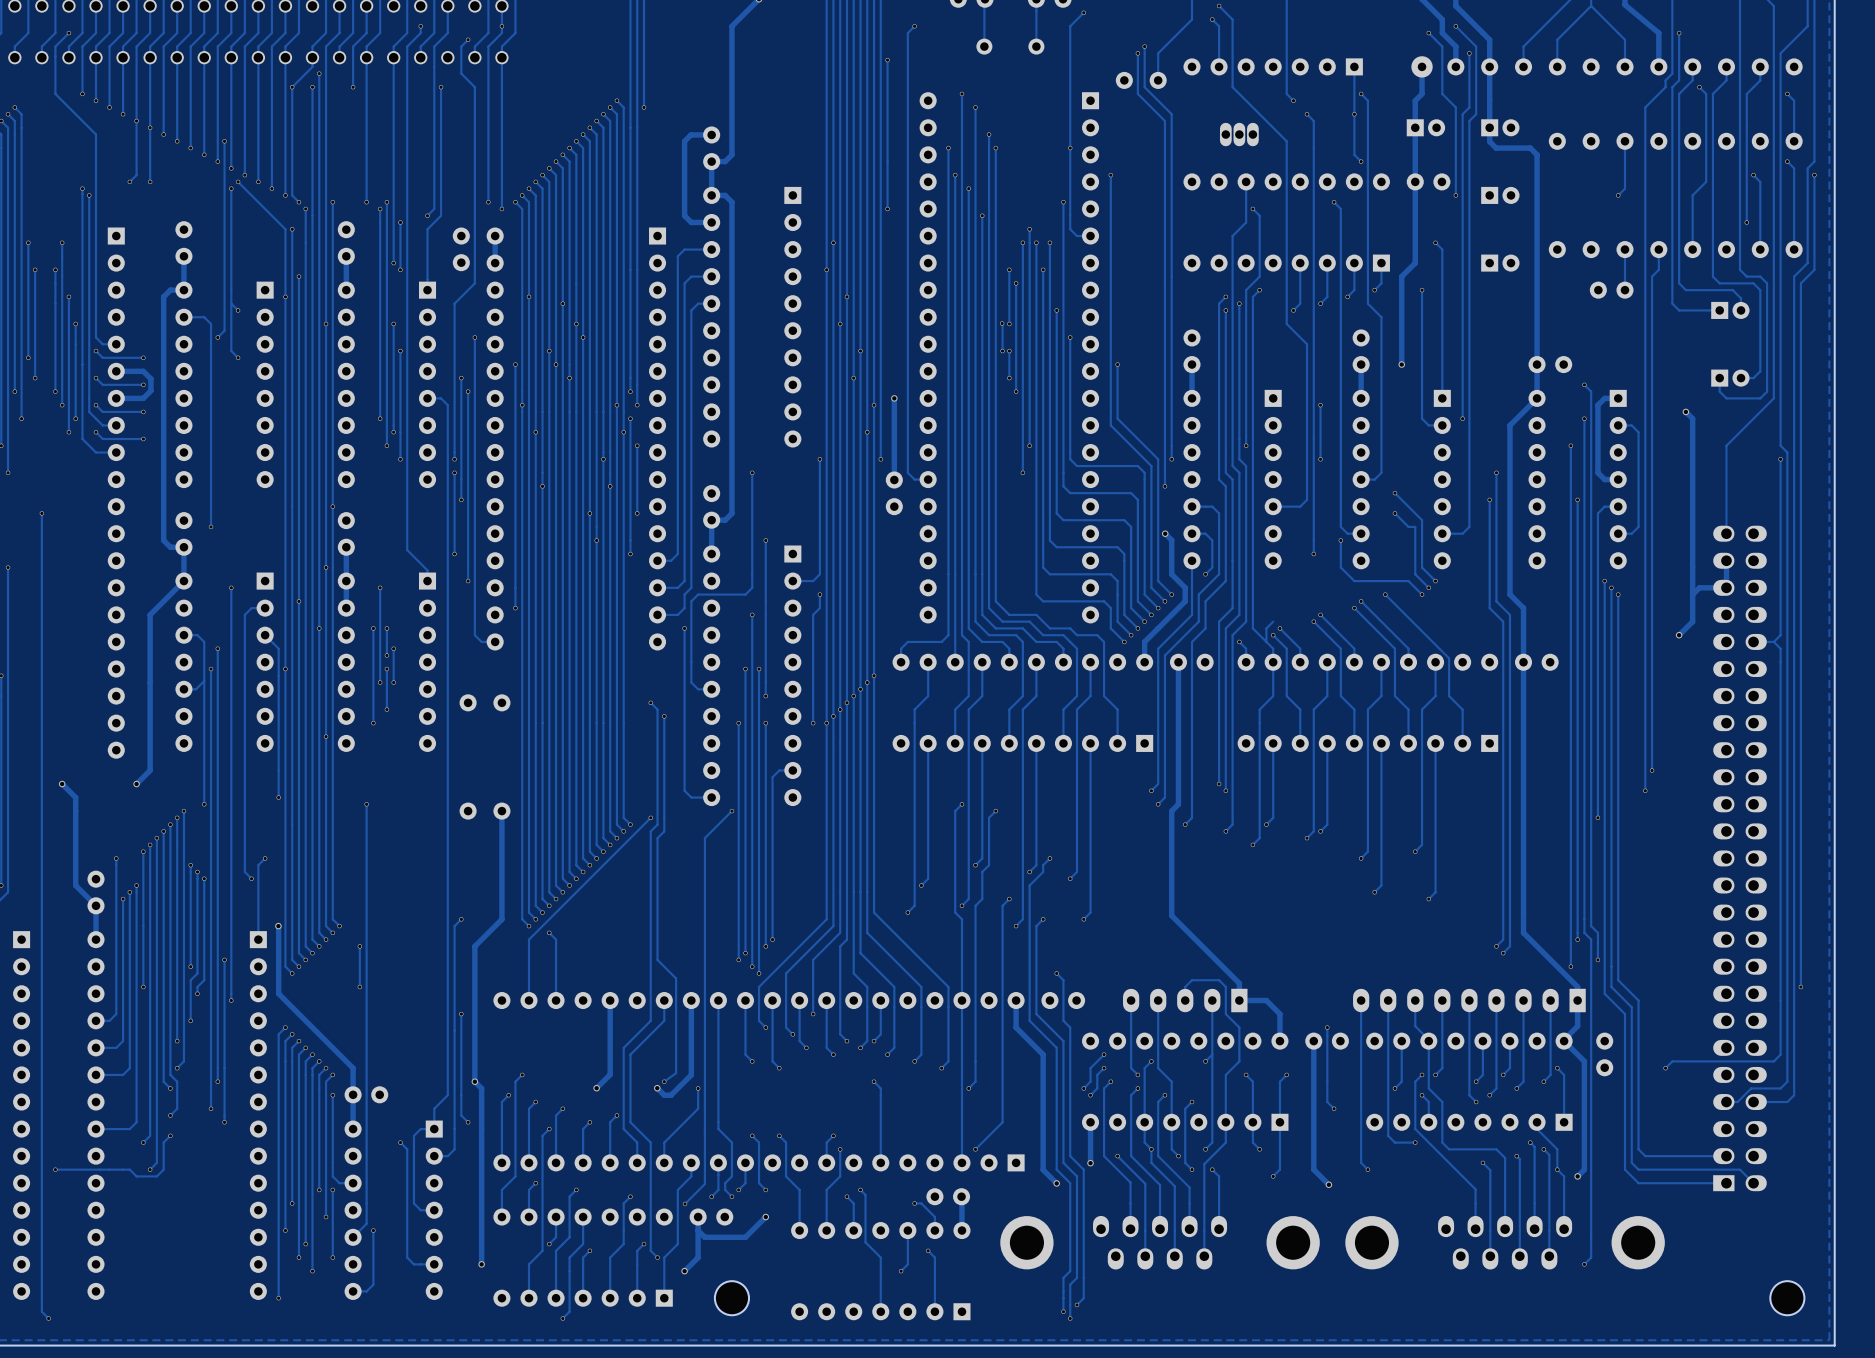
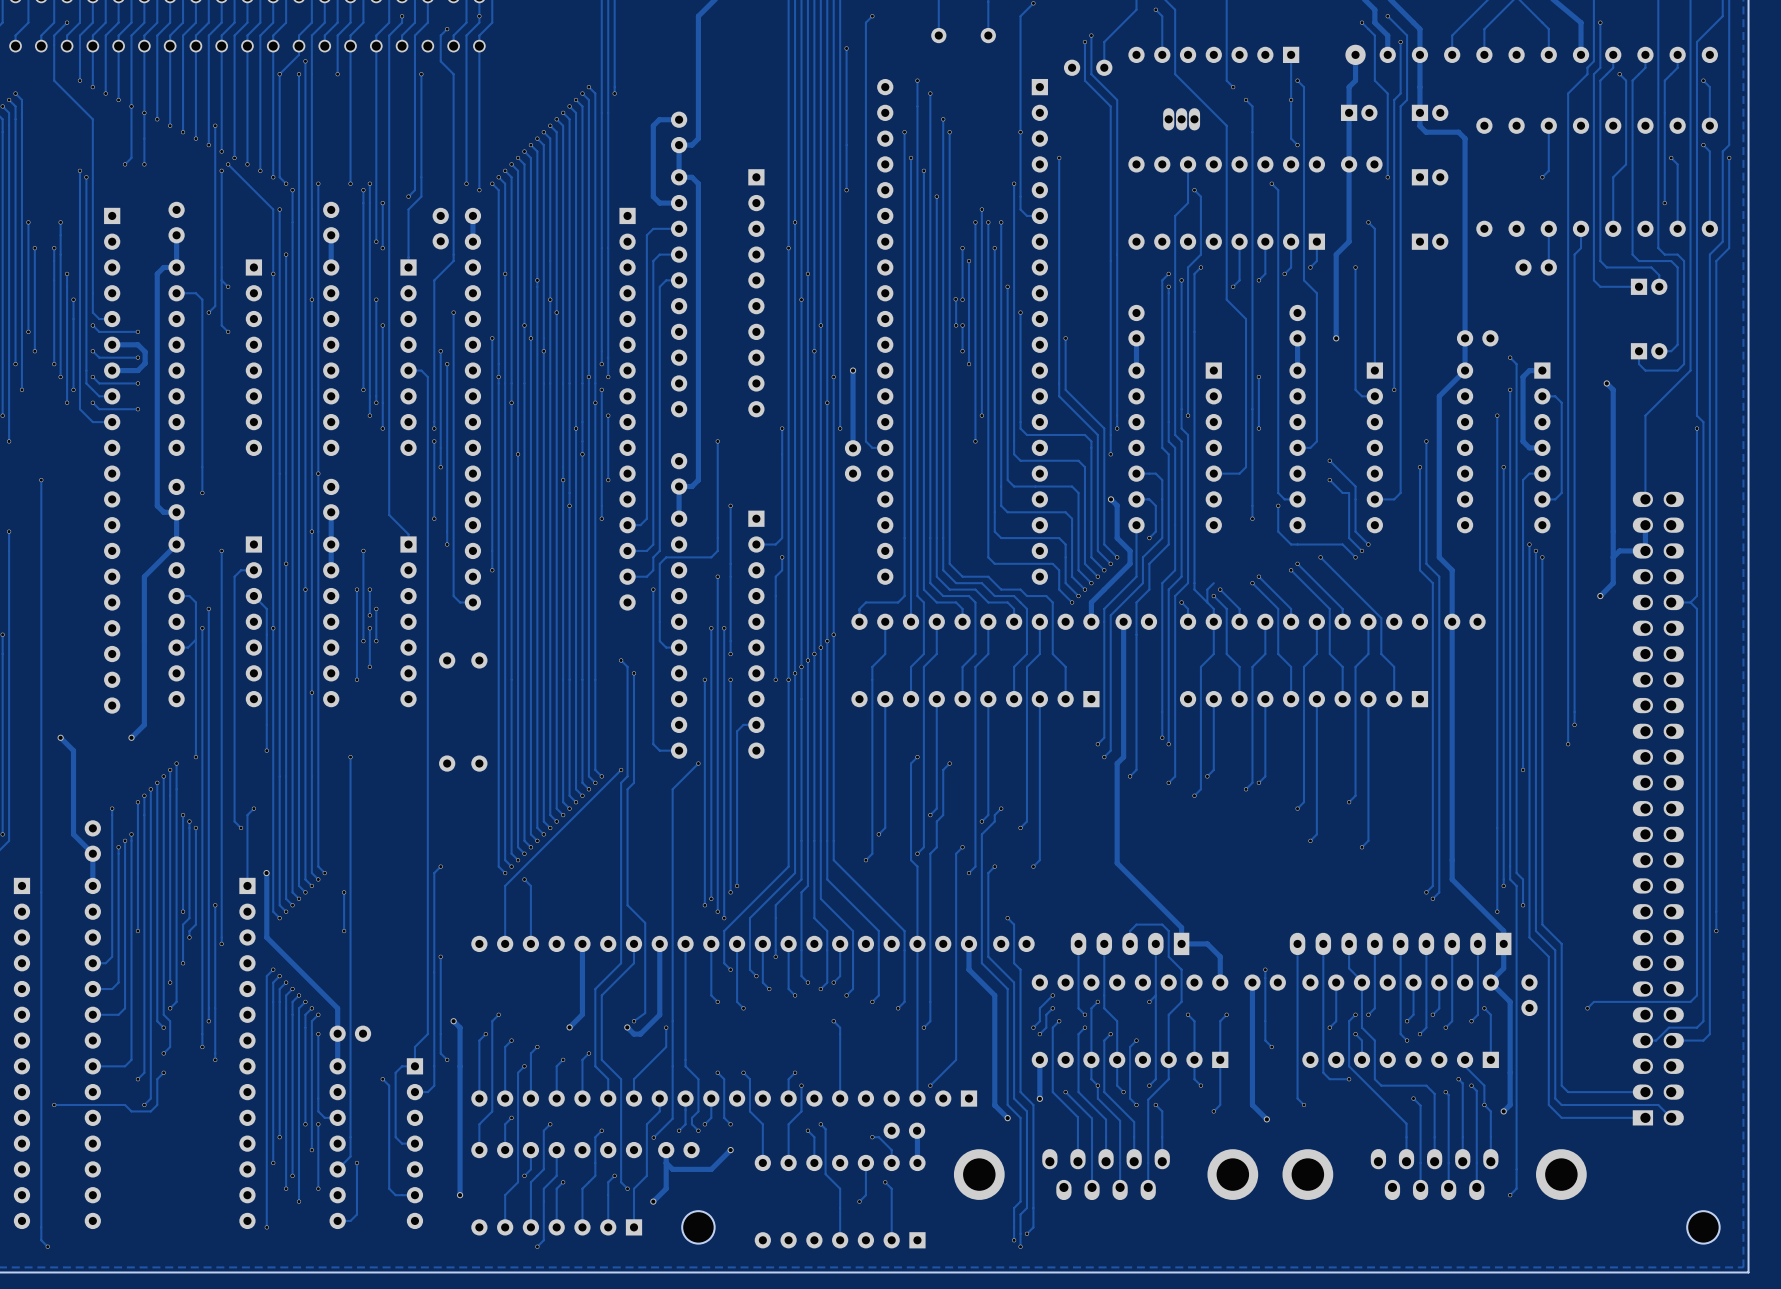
track: (501, 811) (501, 919) (474, 946) (474, 1081) -> none

